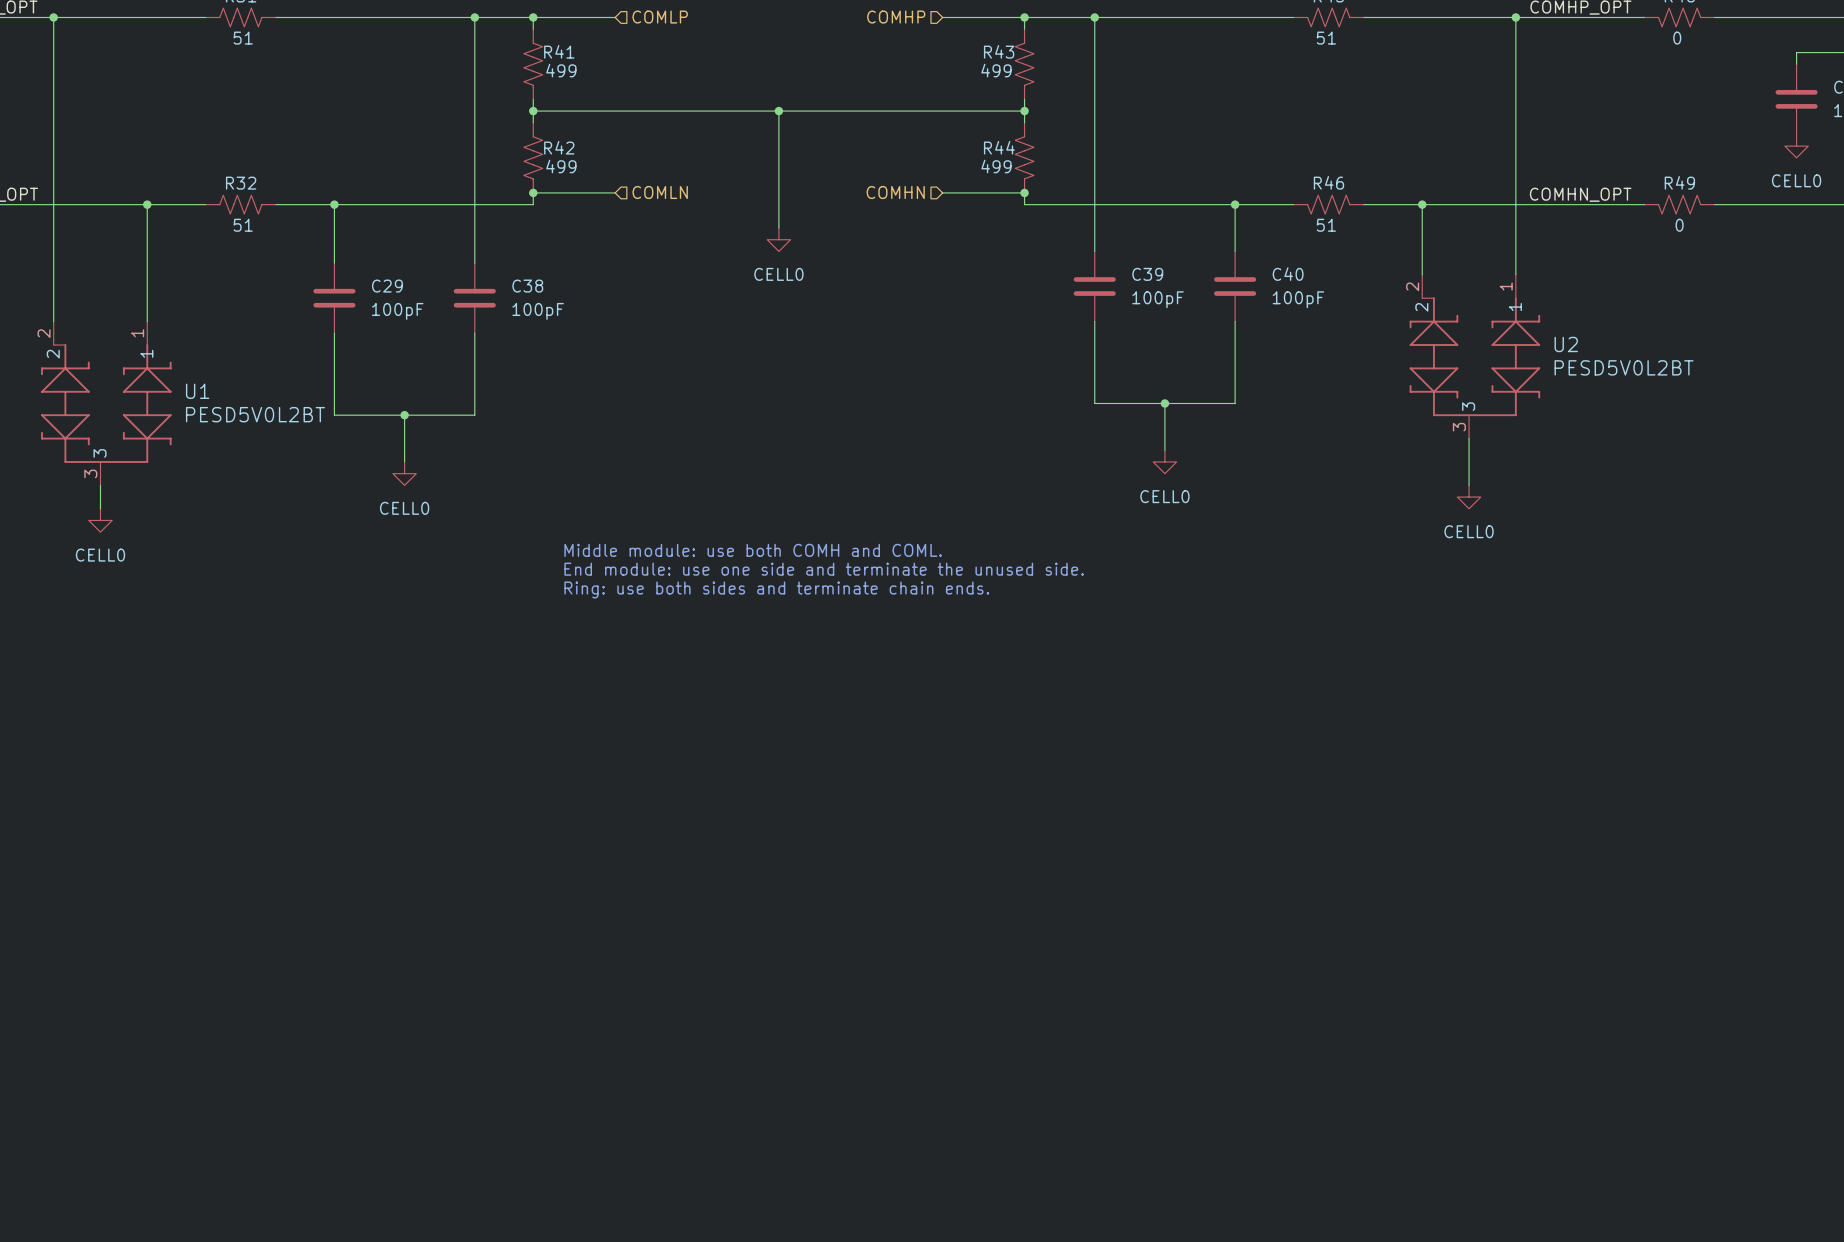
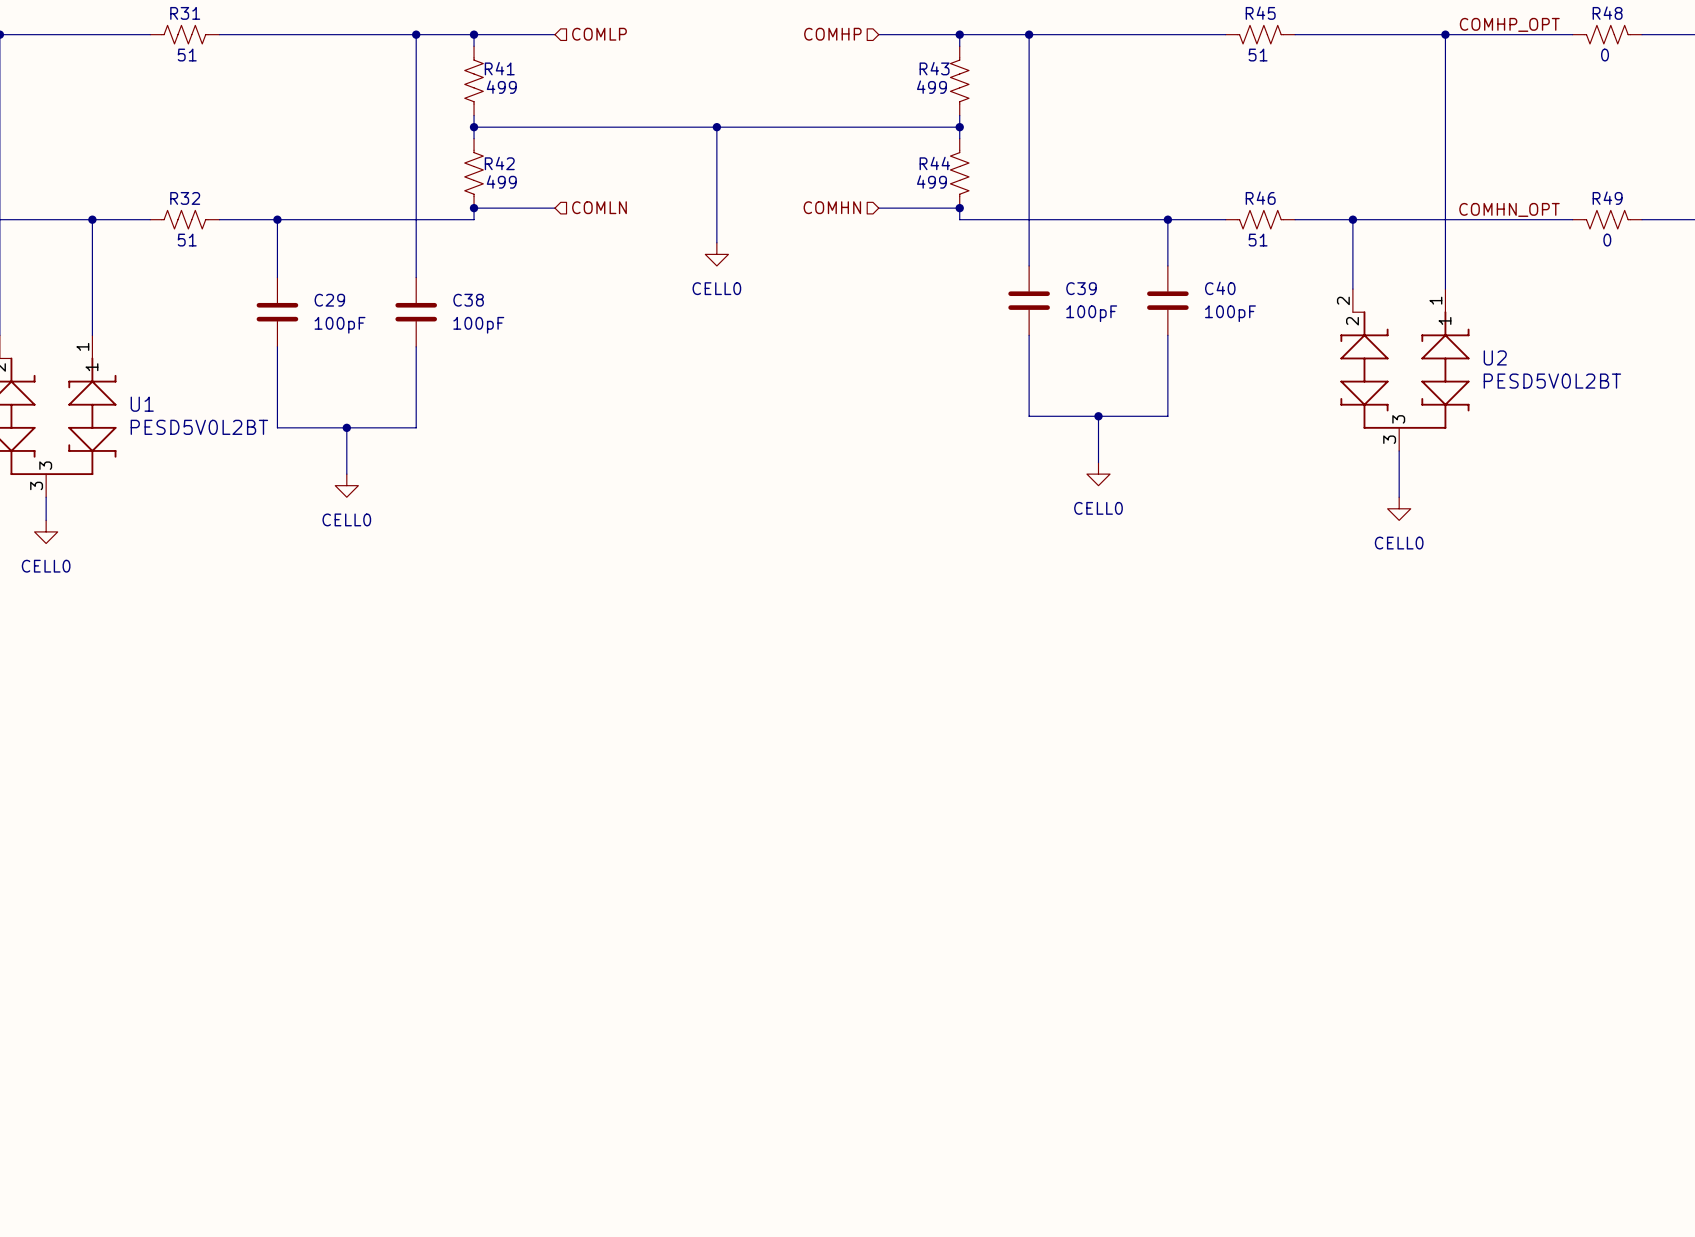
text: Middle module: use both COMH and COML. (753, 550) -> none
text: End module: use one side and terminate the unused side. (824, 569) -> none
text: Ring: use both sides and terminate chain ends. (776, 589) -> none

